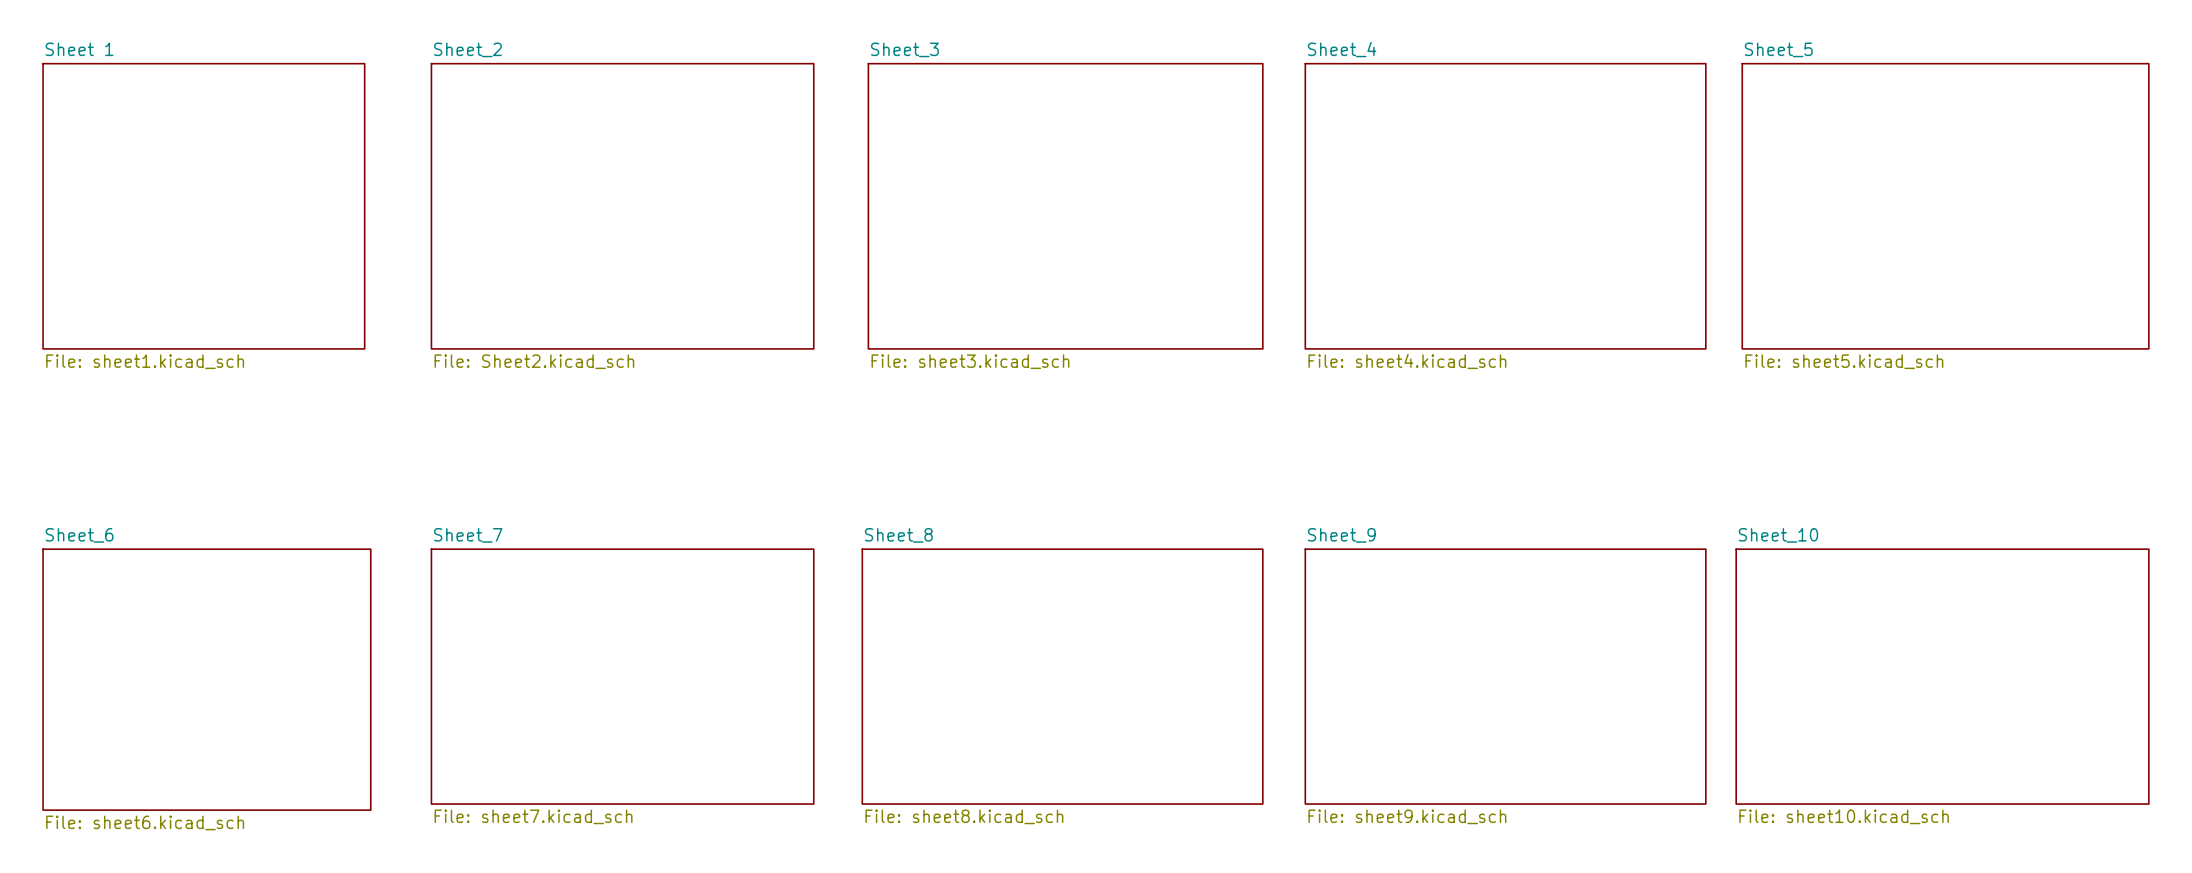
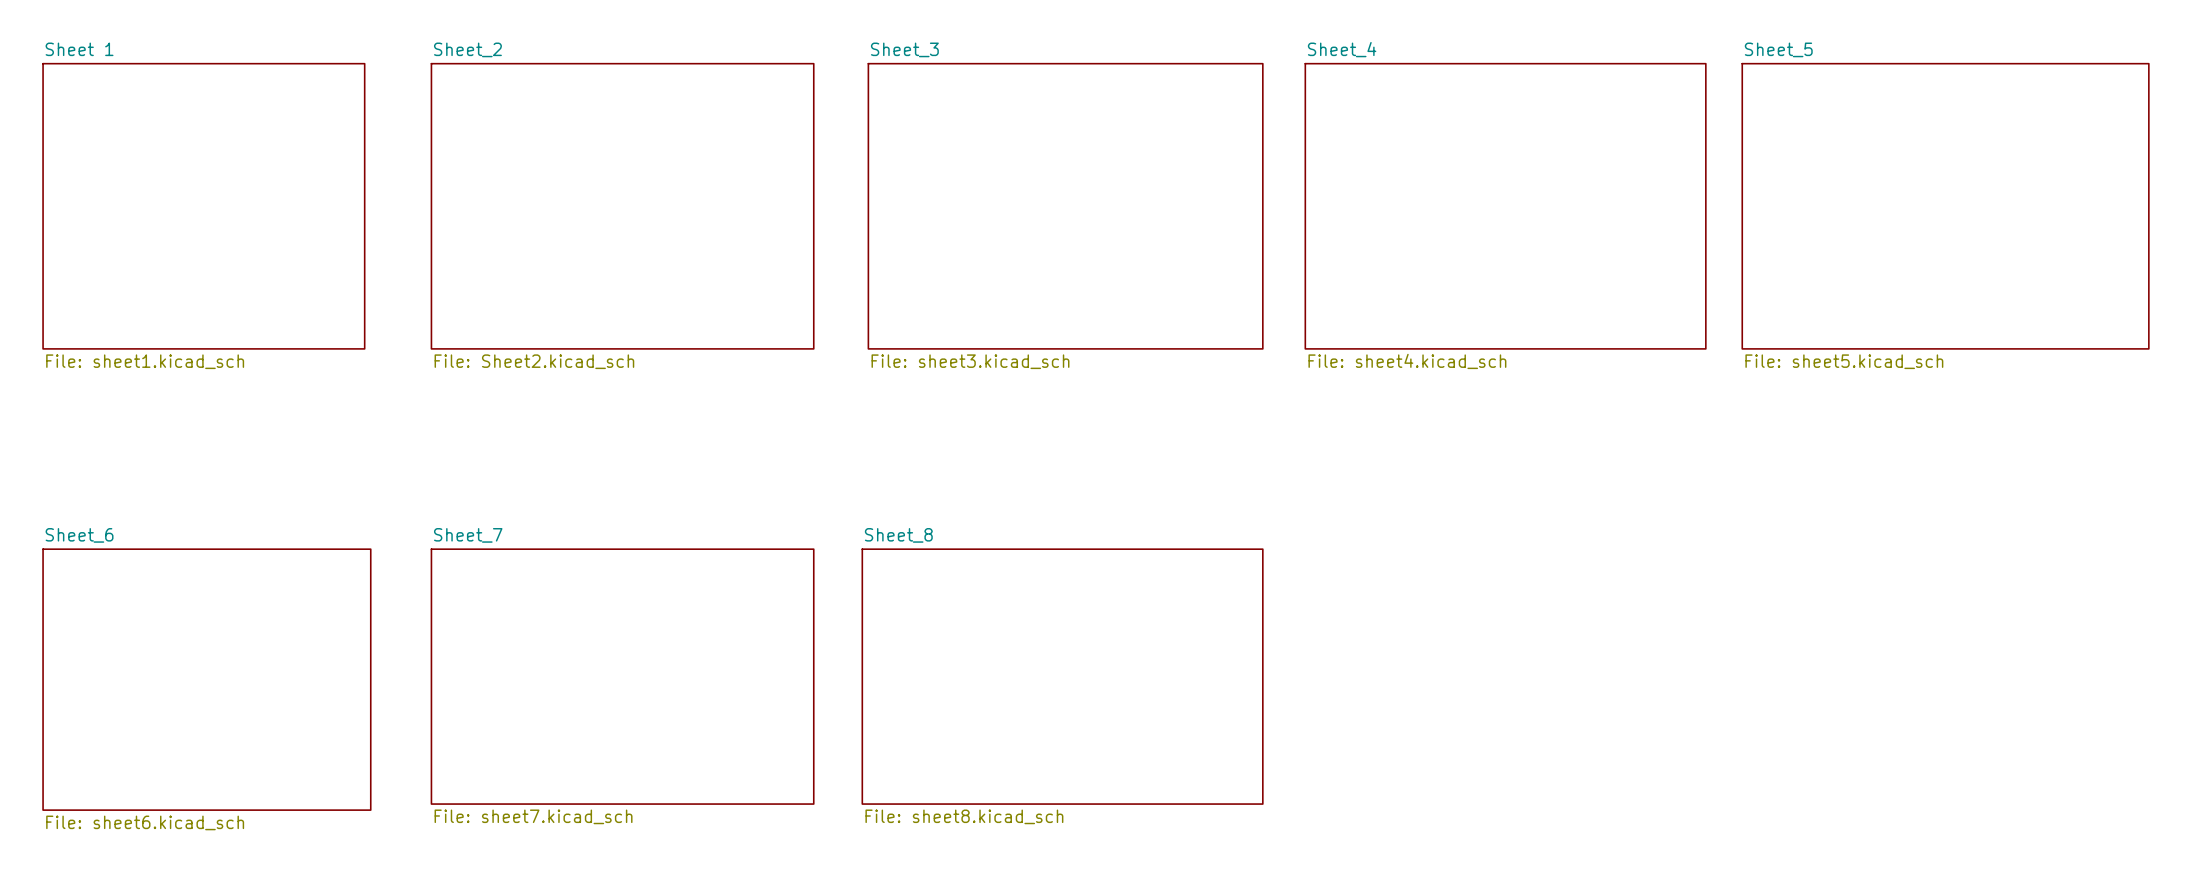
sheet Sheet_9: File: sheet9.kicad_sch (1505, 676) -> none
sheet Sheet_10: File: sheet10.kicad_sch (1942, 676) -> none

